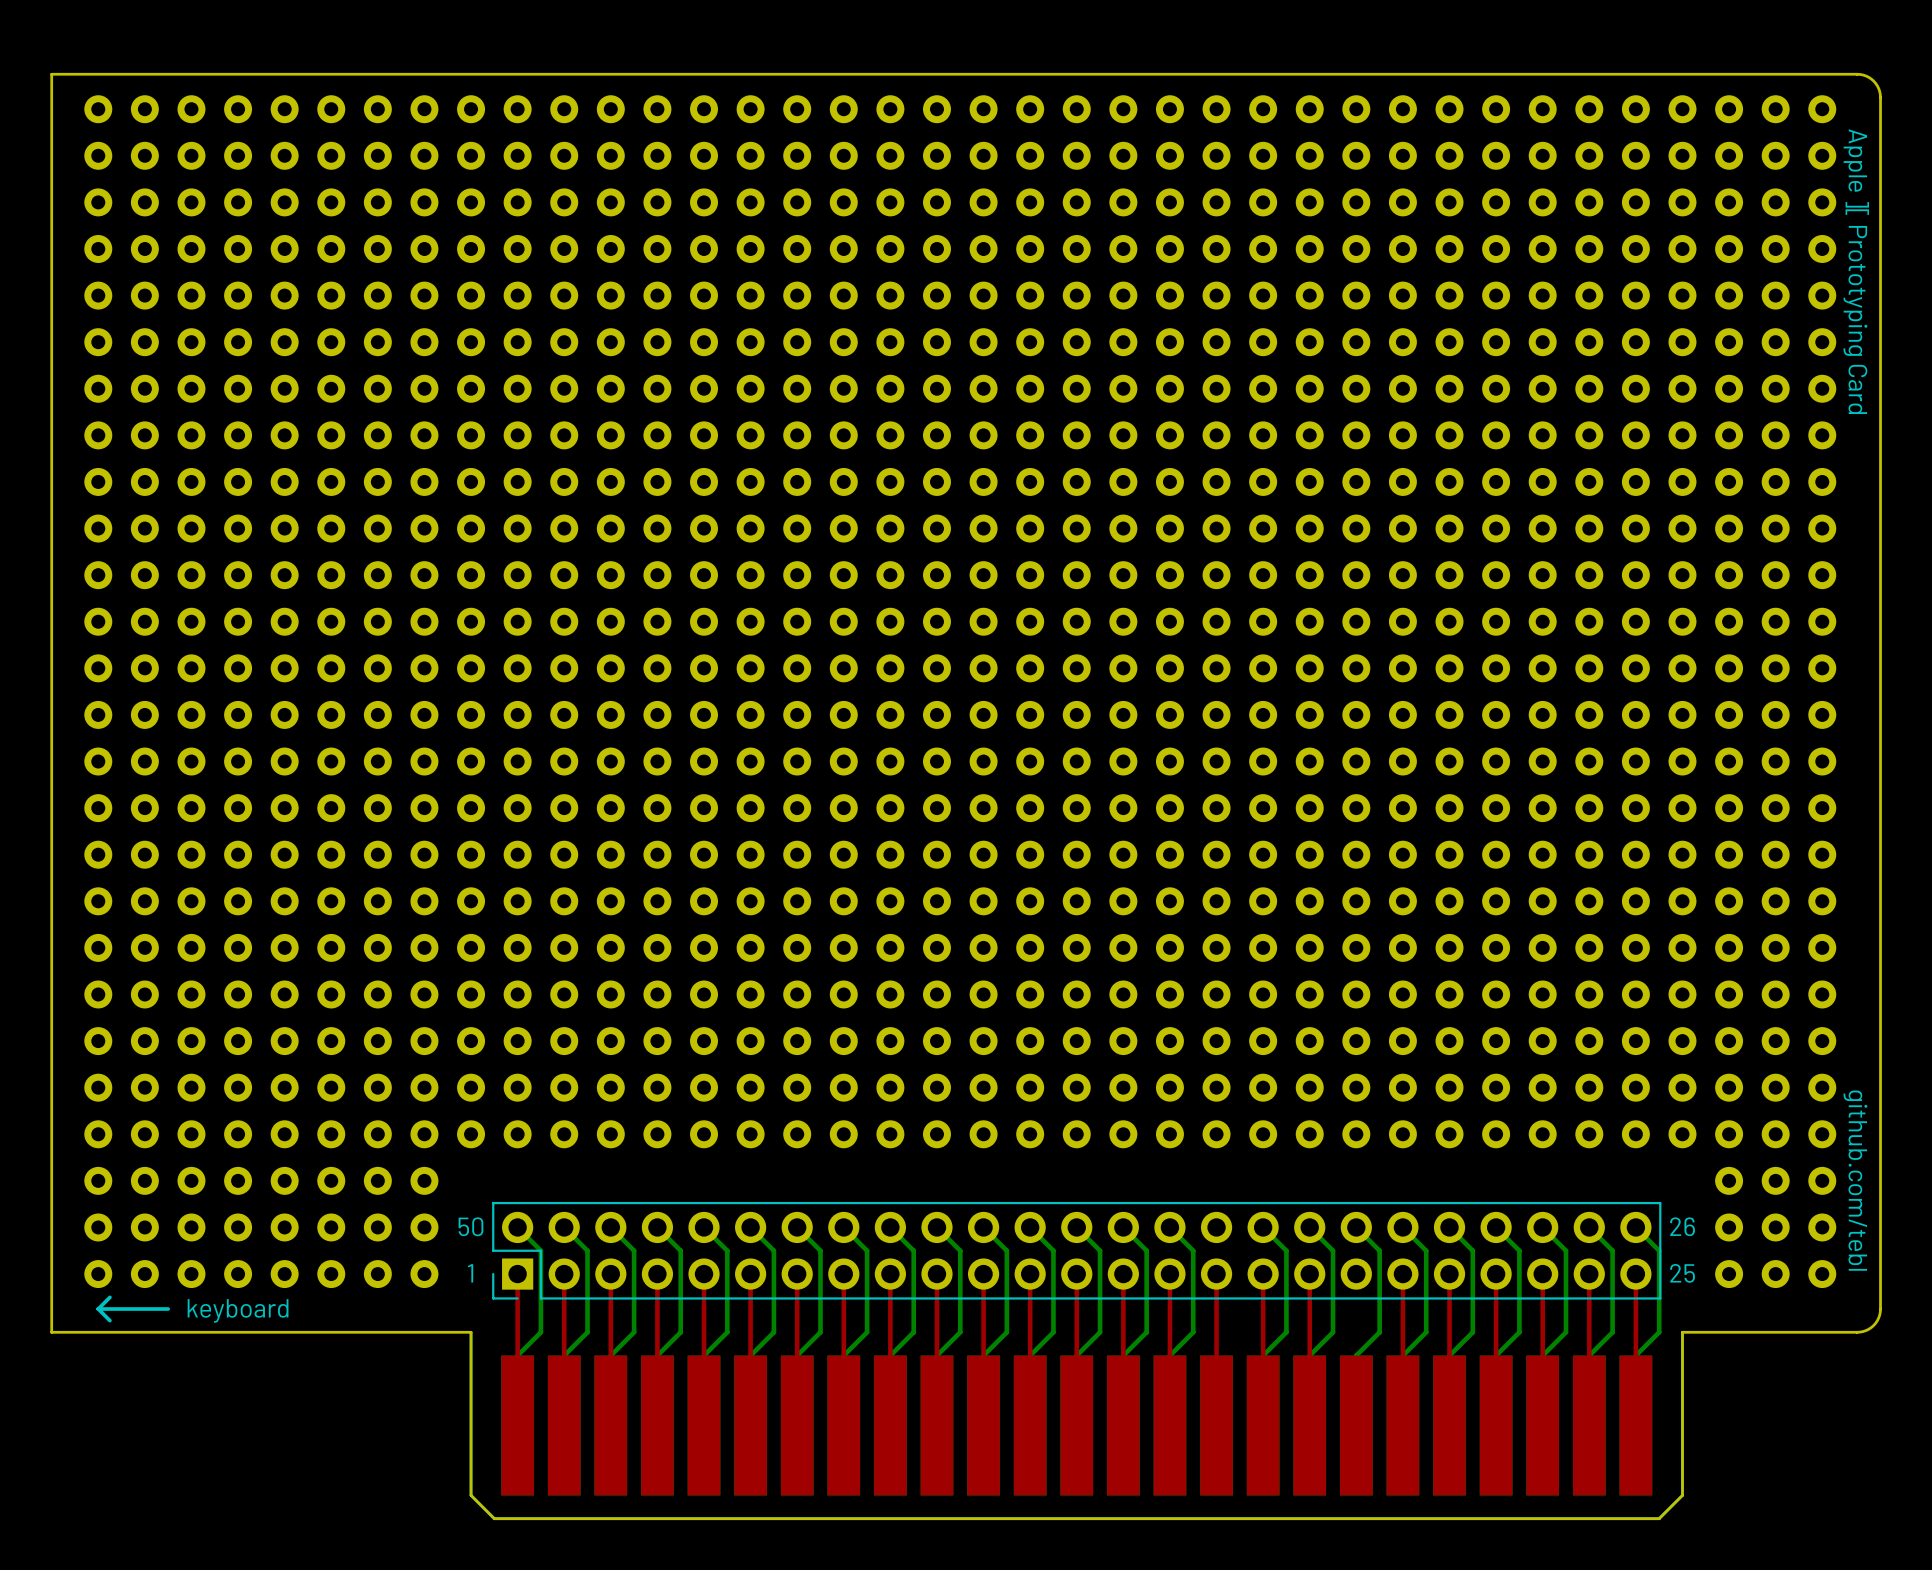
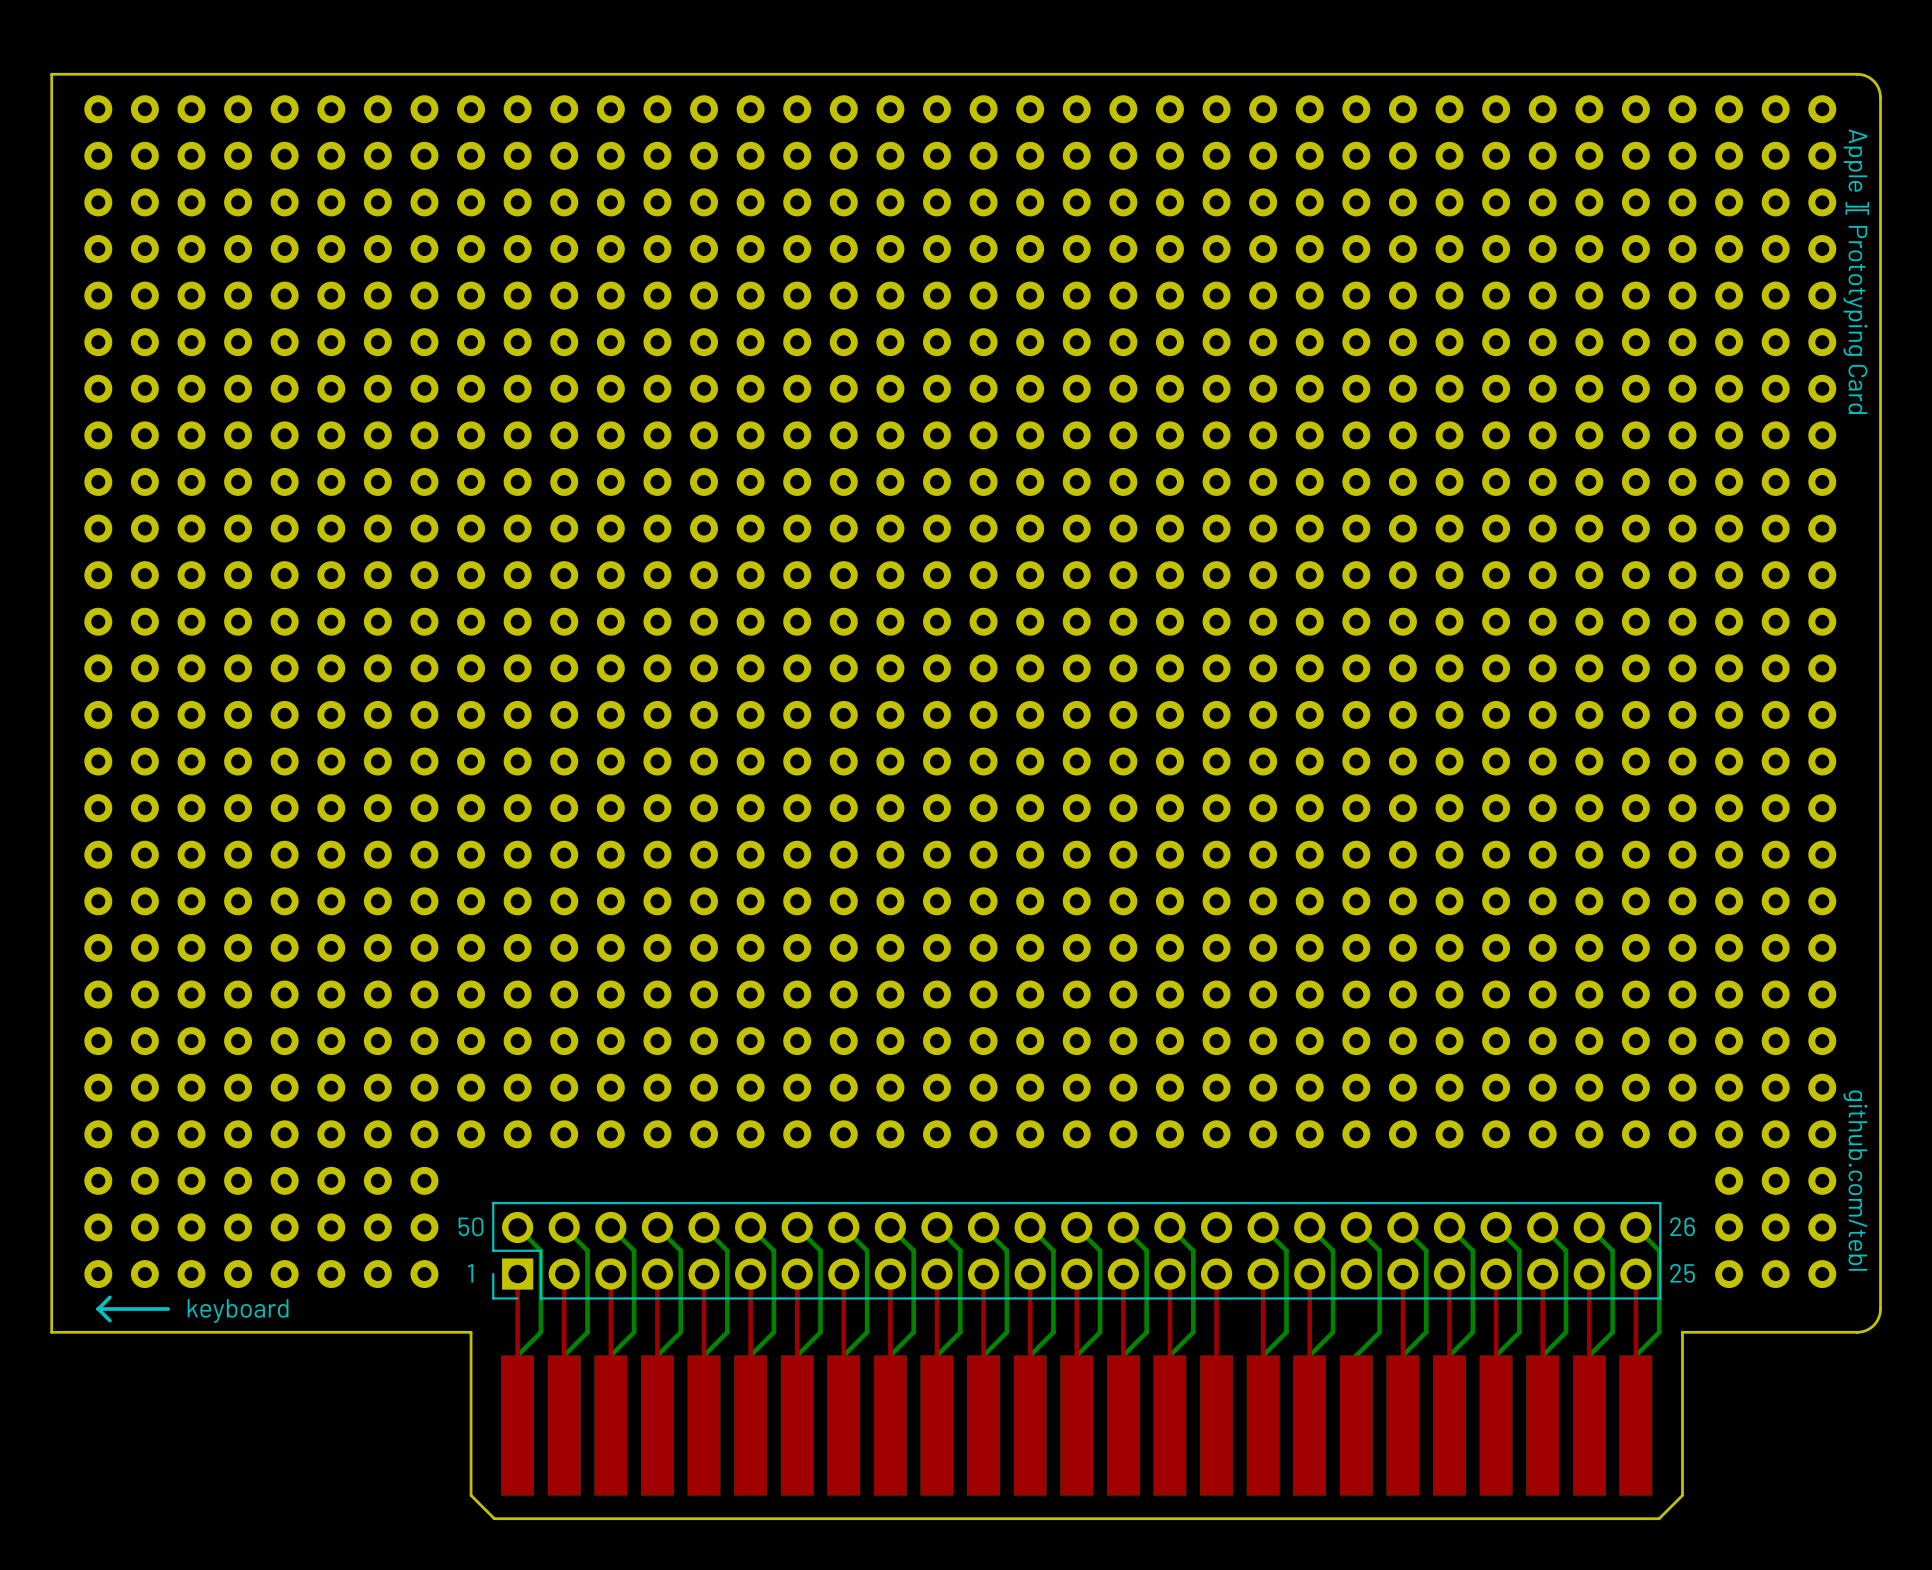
part footprint: [469, 1330, 1684, 1521] -> [501, 1355, 1653, 1496]

